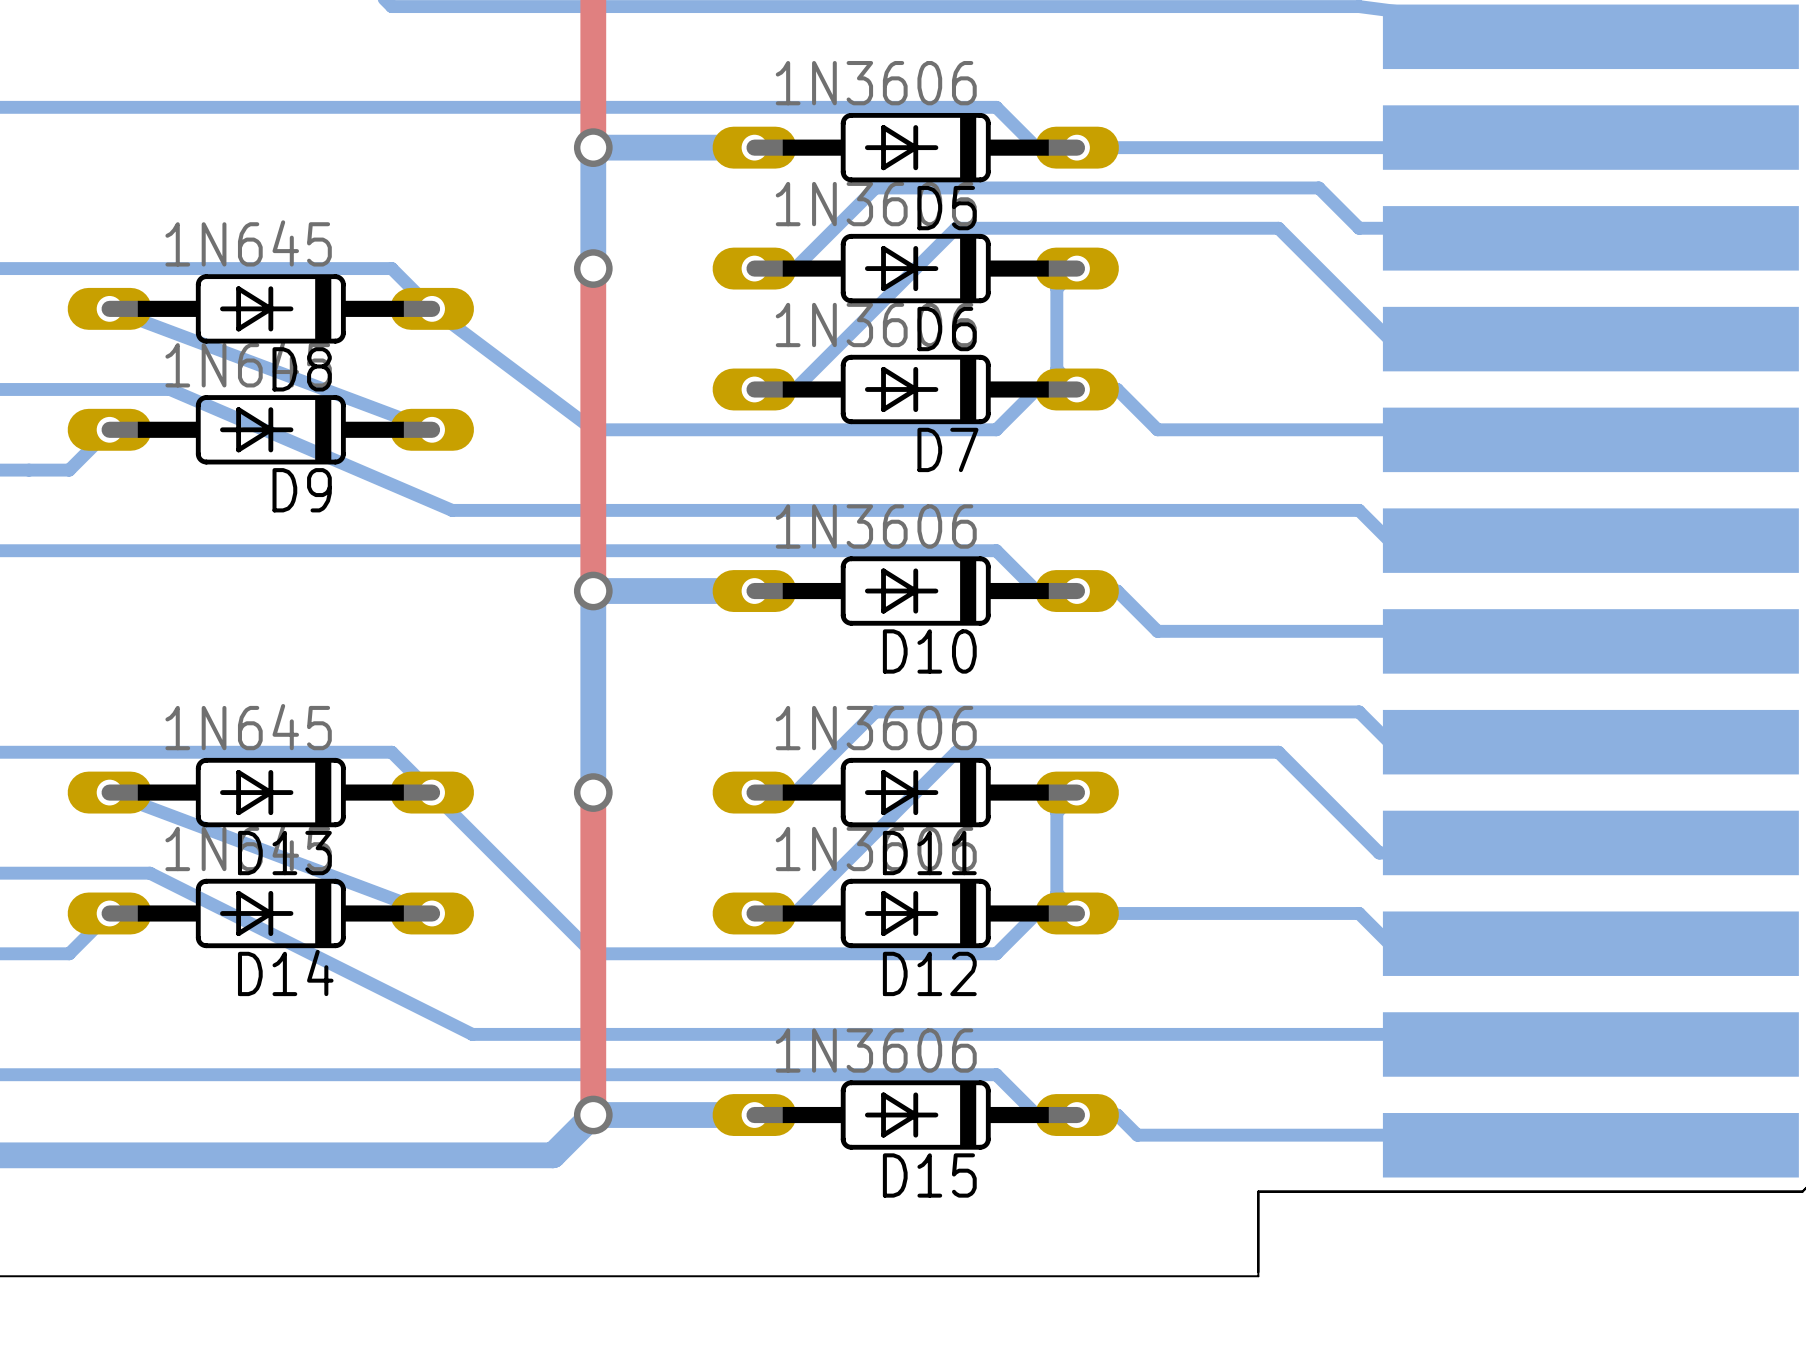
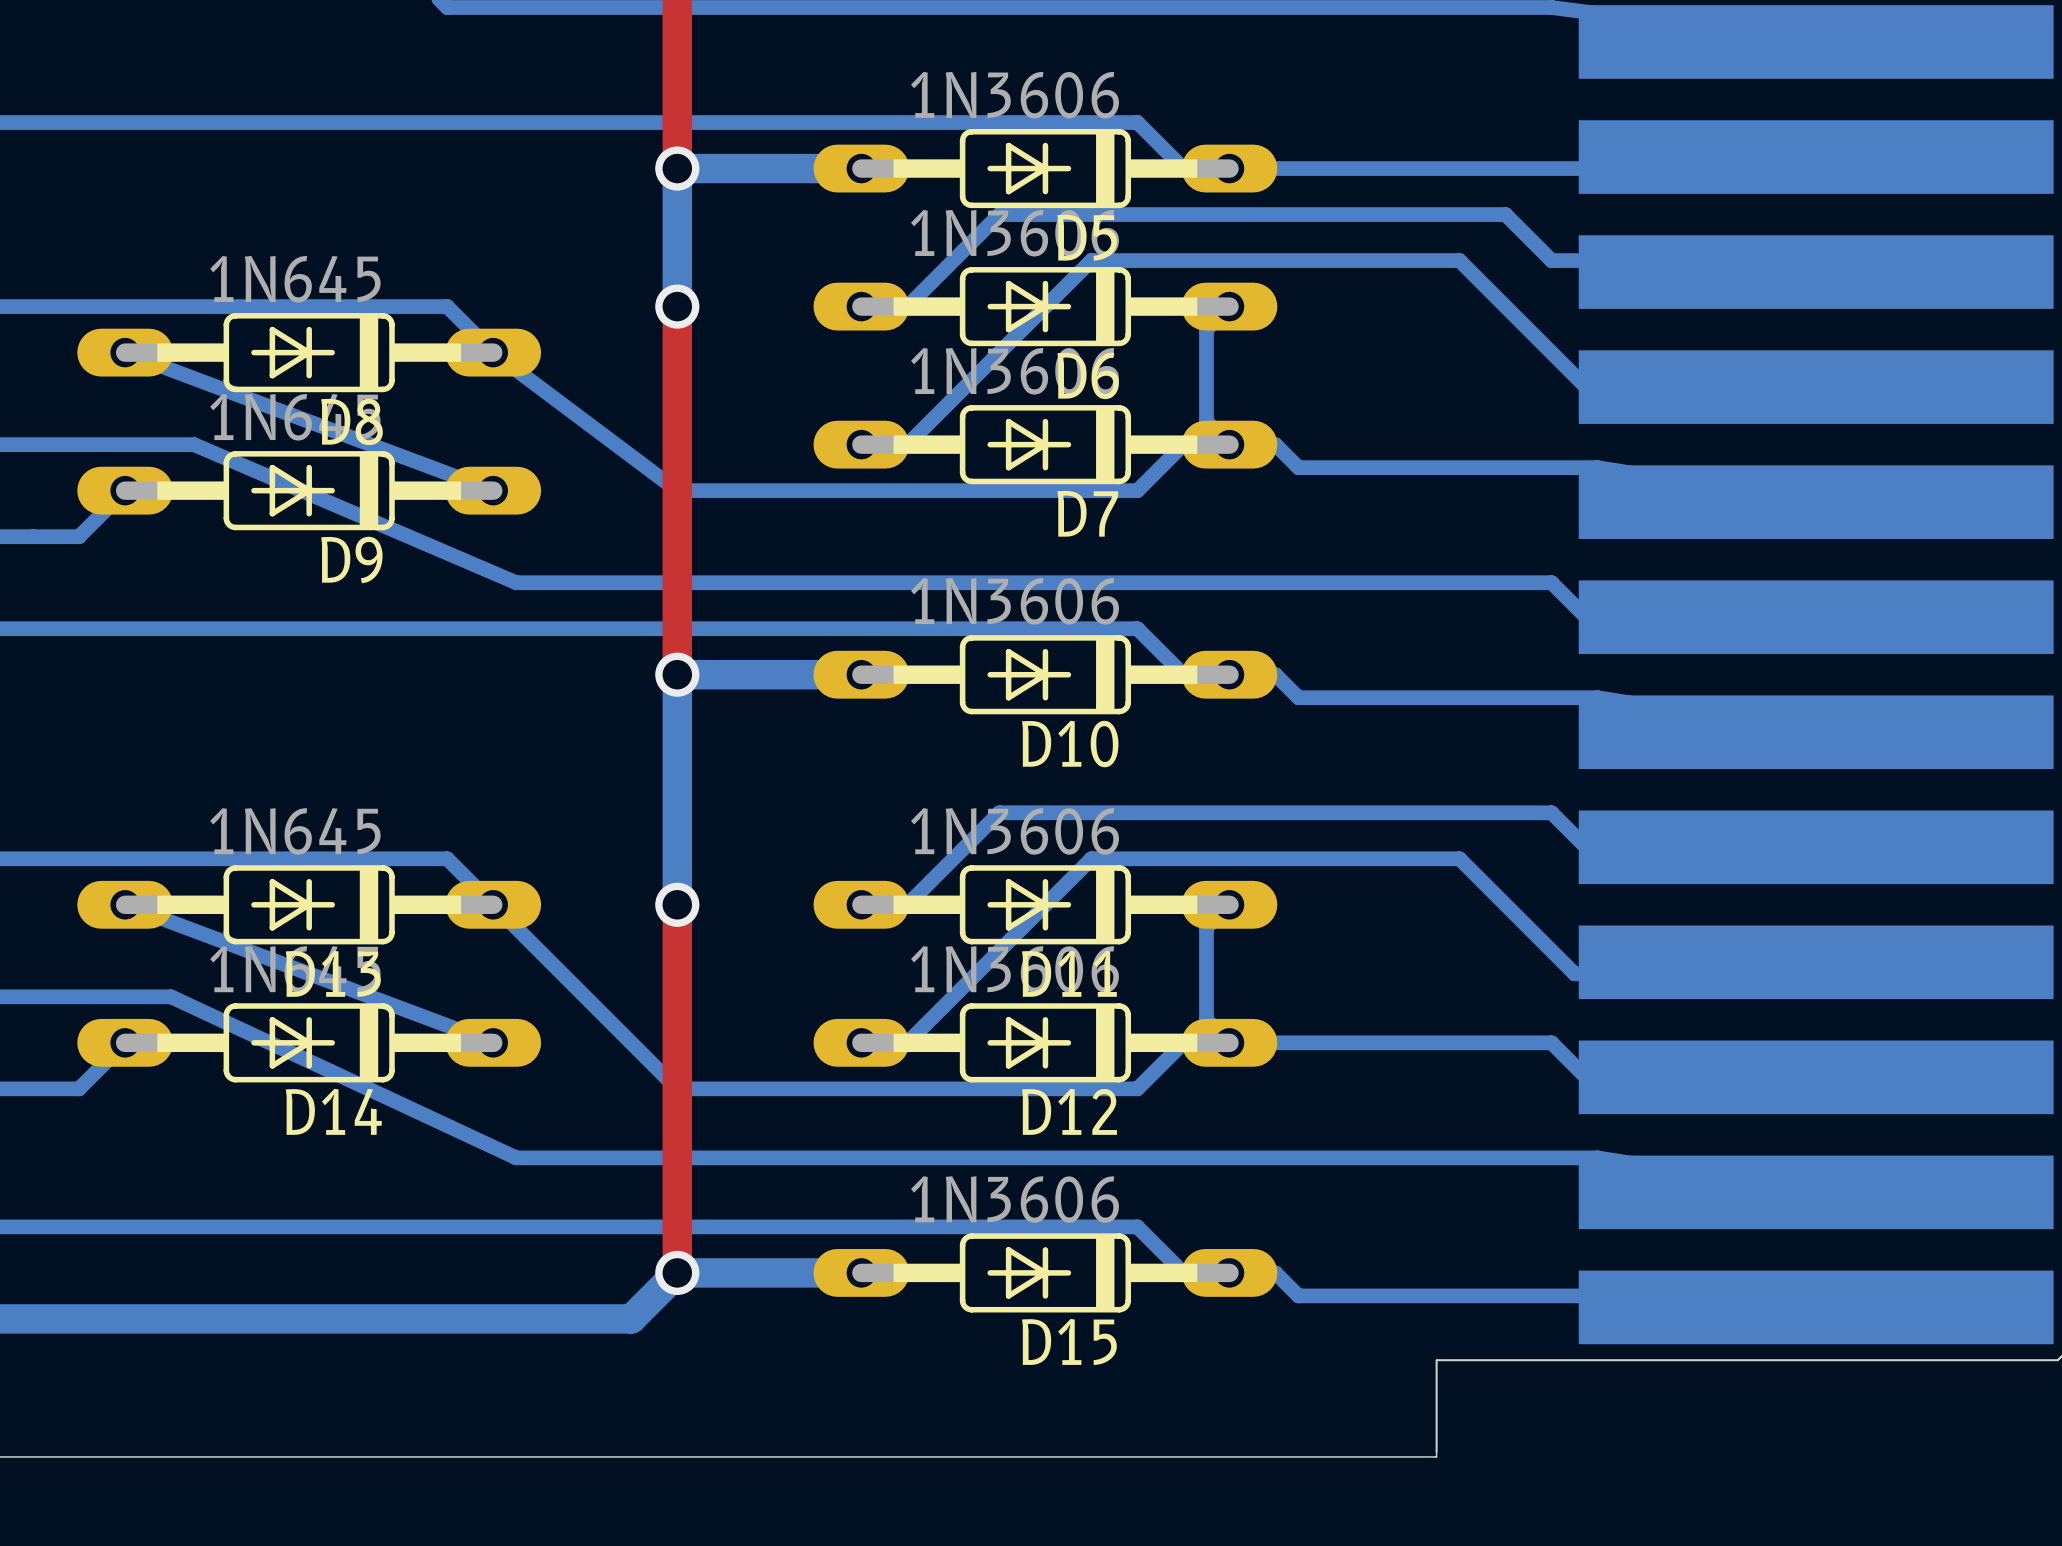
bottom track: (1137, 409) (1157, 429) (1399, 429) (1590, 439) -> (1298, 467) (1597, 467) (1816, 502)
bottom track: (1137, 611) (1157, 631) (1399, 631) (1590, 641) -> (1298, 697) (1597, 697) (1816, 732)
bottom track: (149, 873) (472, 1034) (1399, 1034) (1590, 1044) -> (171, 996) (516, 1157) (1597, 1157) (1816, 1192)

